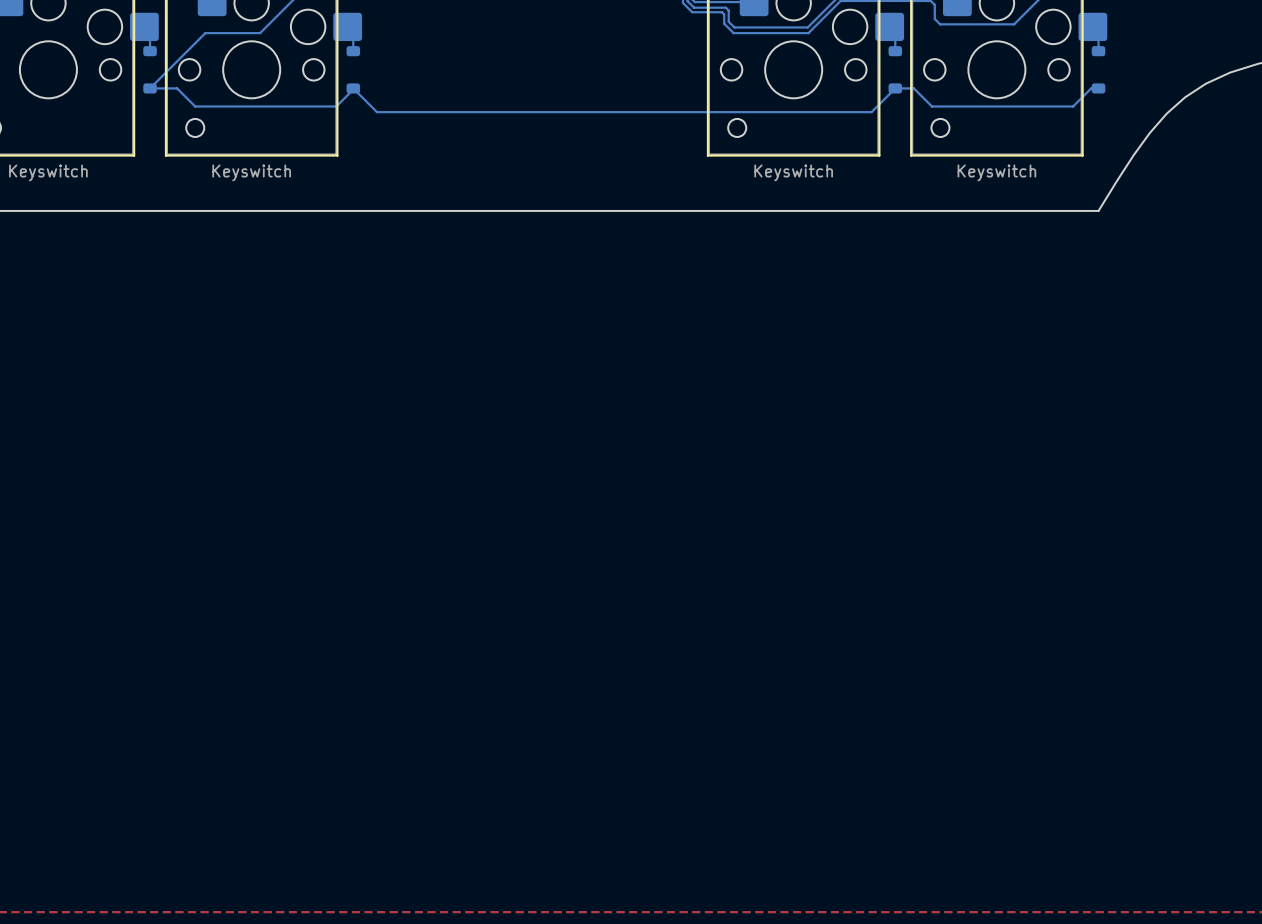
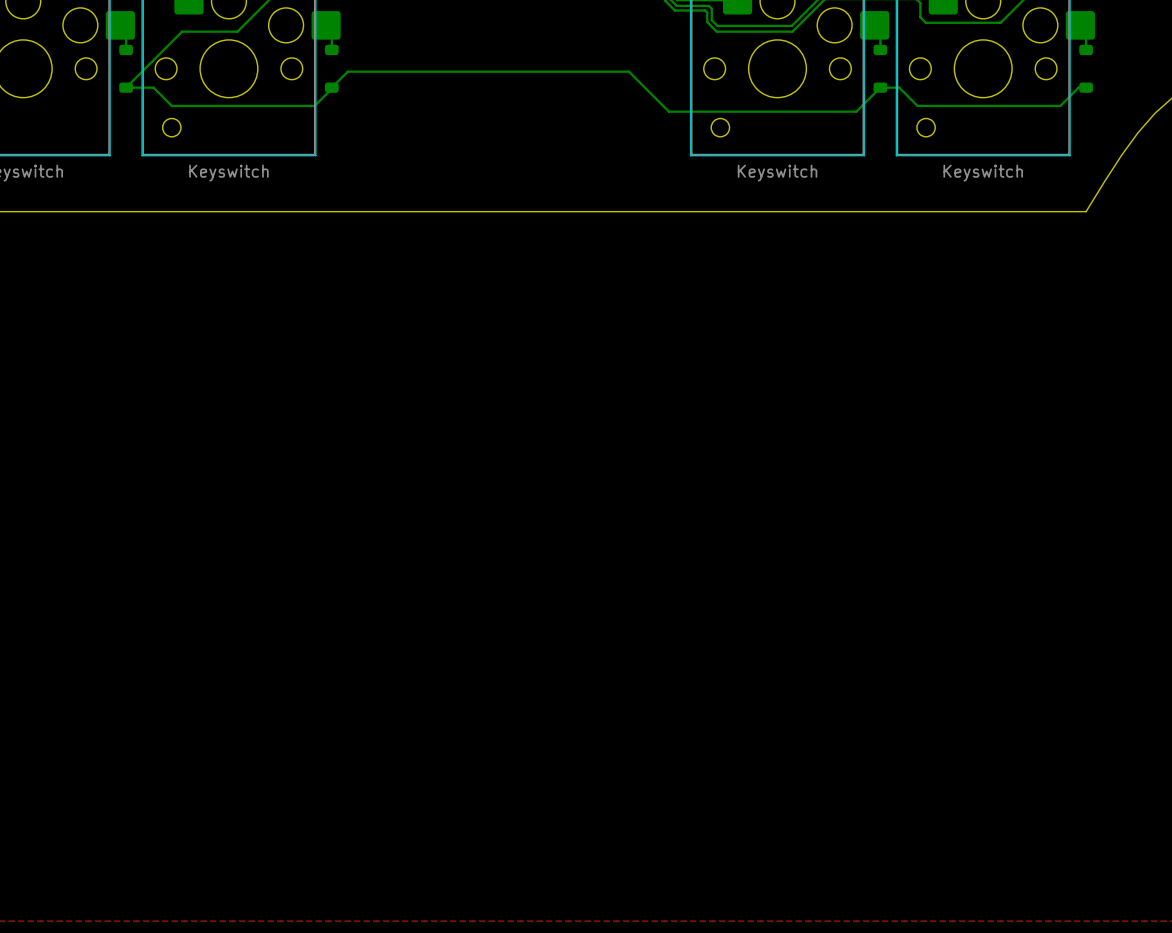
bottom track: (353, 88) (377, 112) (686, 112) -> (331, 87) (347, 71) (628, 71) (668, 111)

